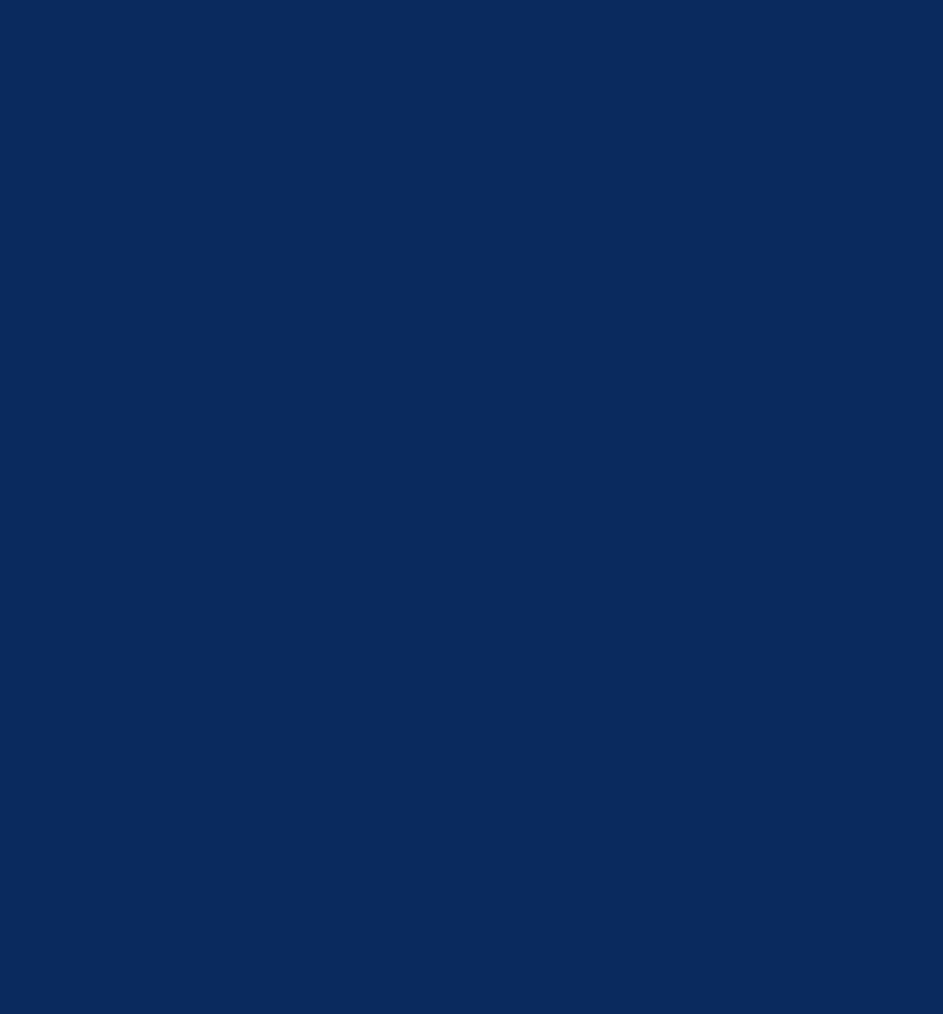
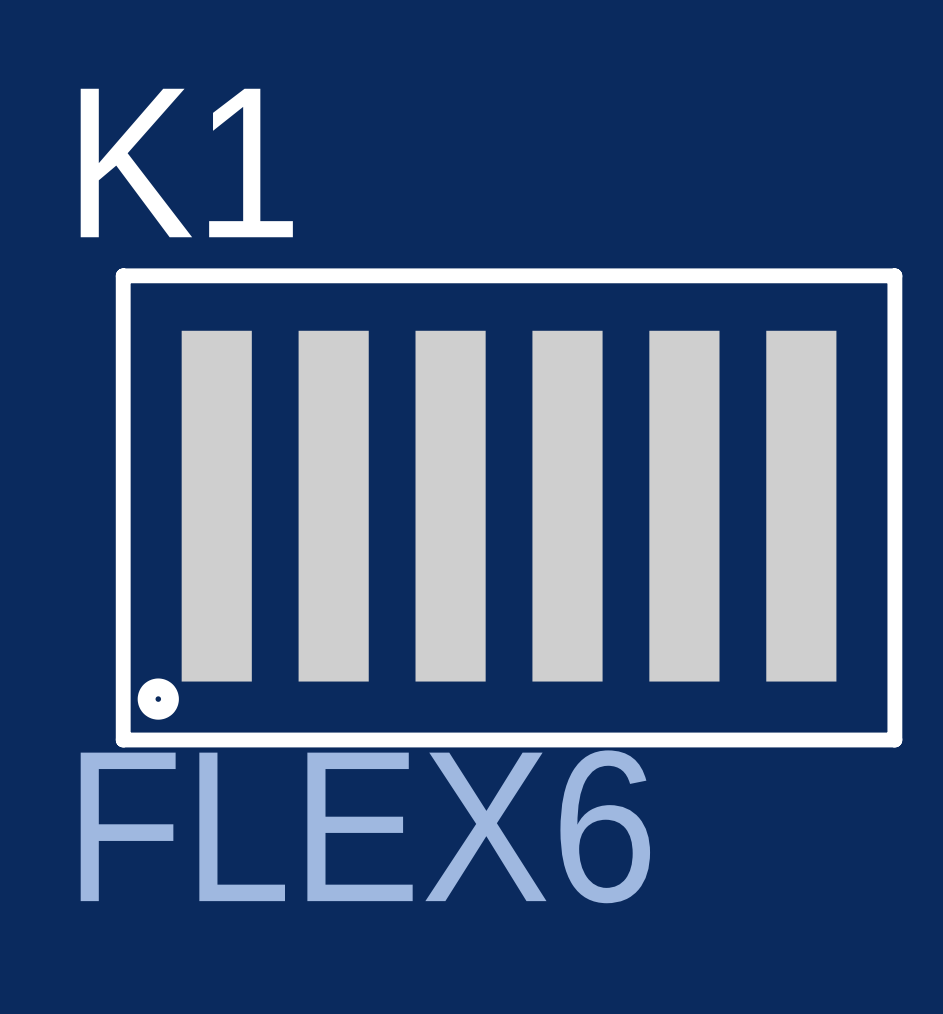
K1: none -> FLEX6 (509, 507)

